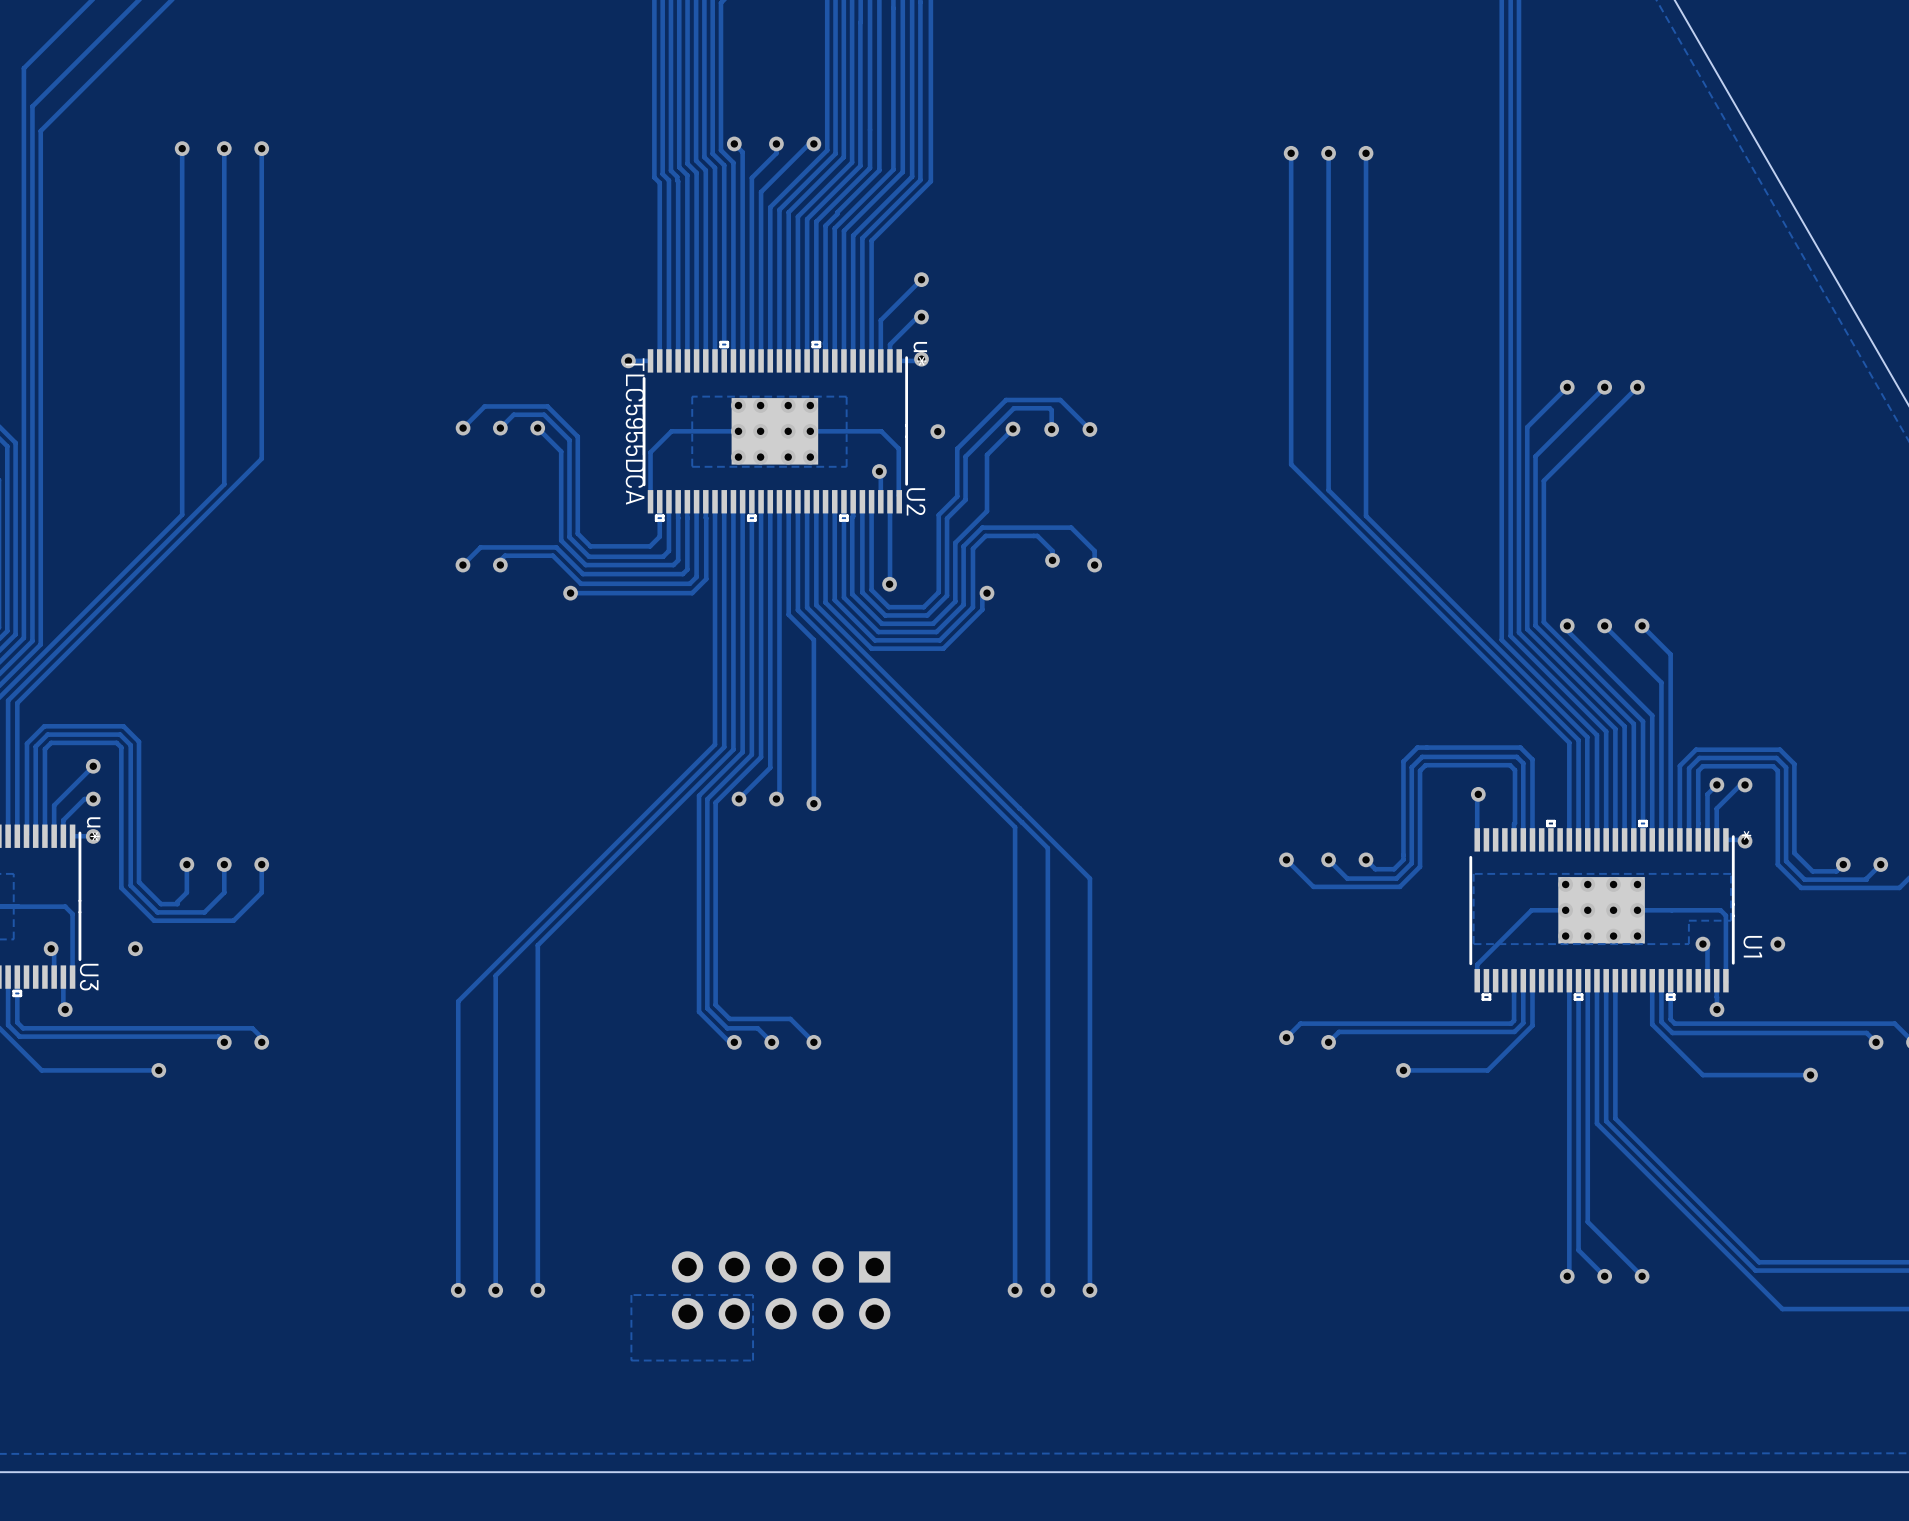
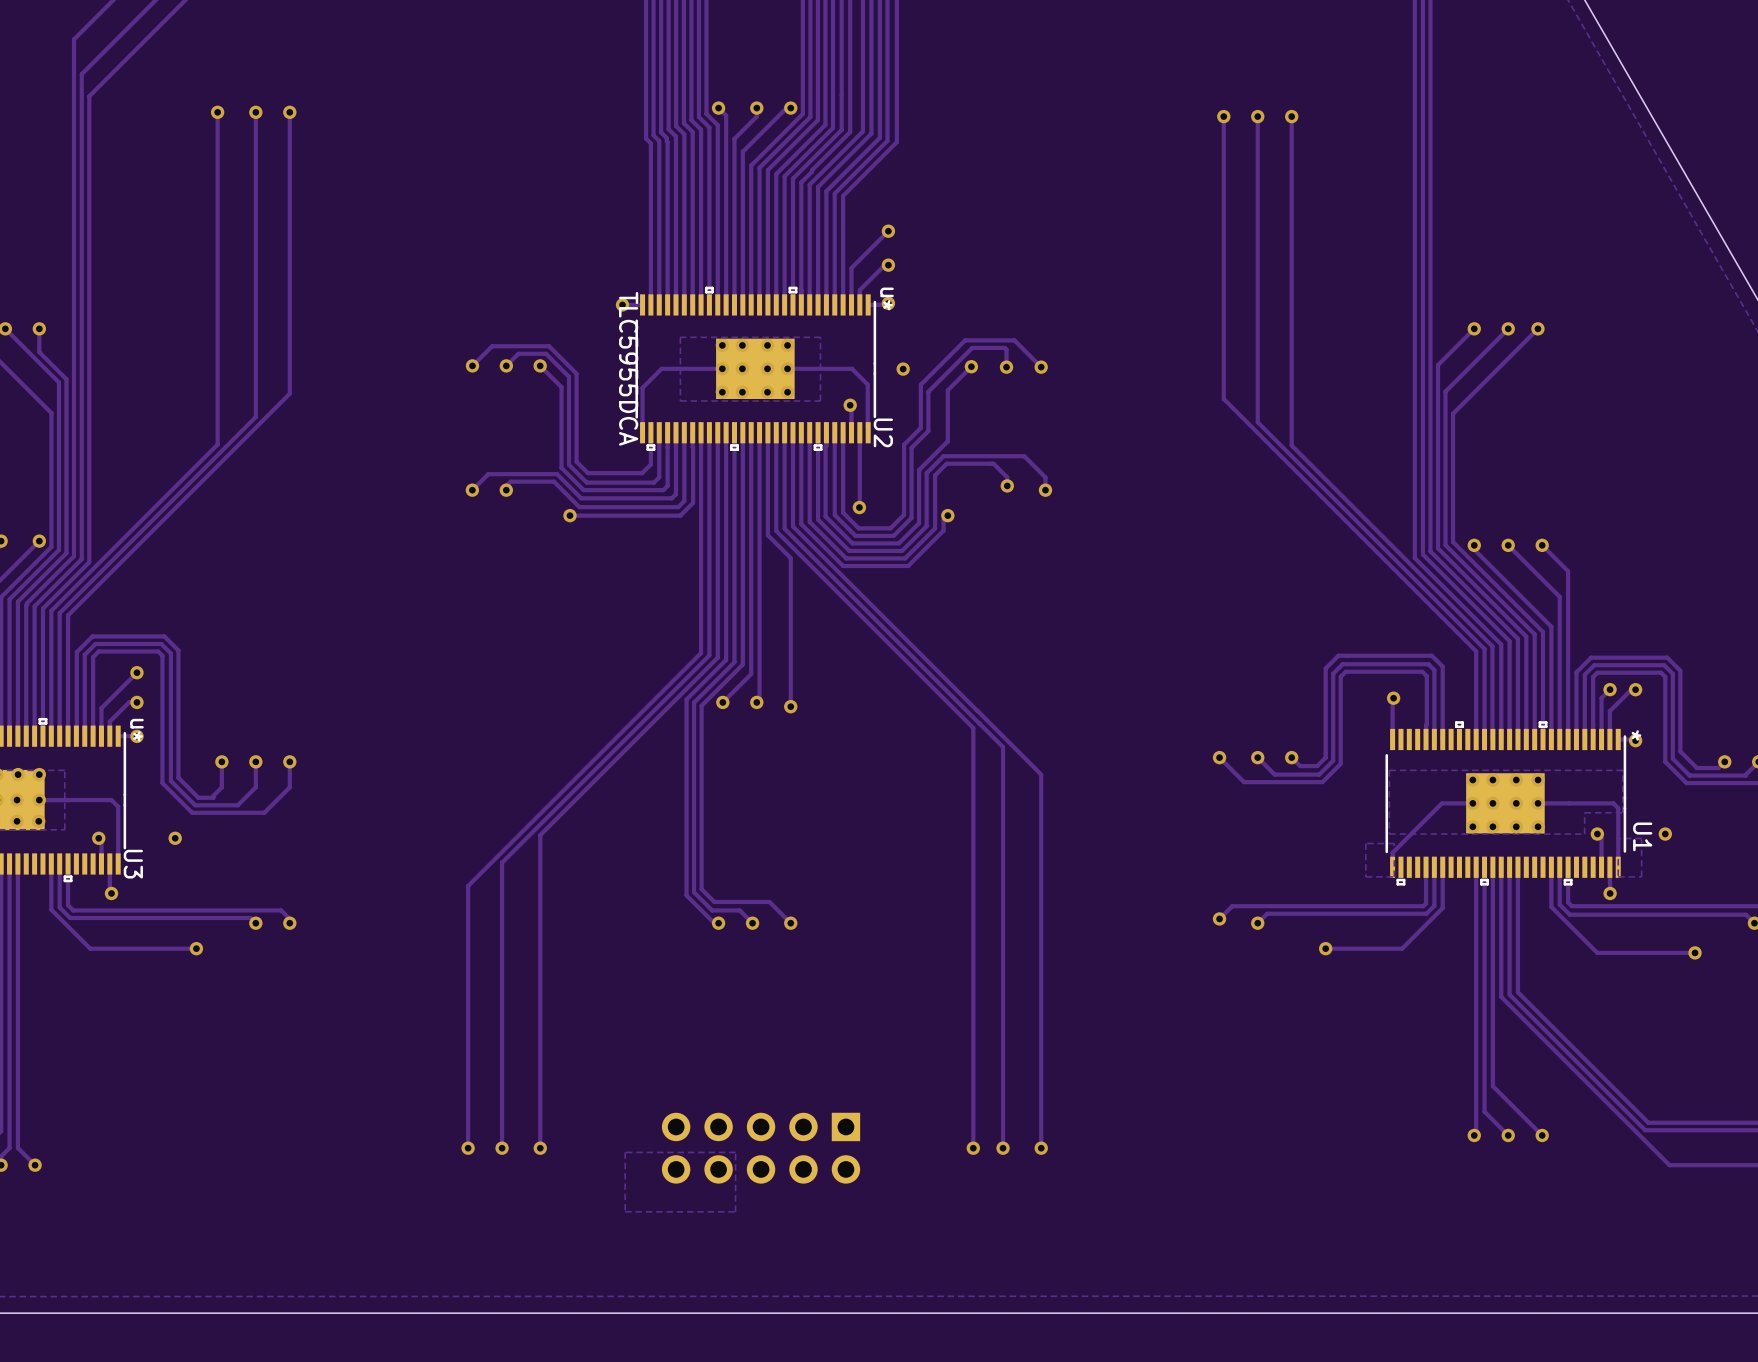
zone outline: none -> (1641, 838) (1641, 876) (1618, 876) (1618, 838) (1641, 838)
zone outline: none -> (1394, 843) (1394, 876) (1365, 876) (1365, 843) (1394, 843)

